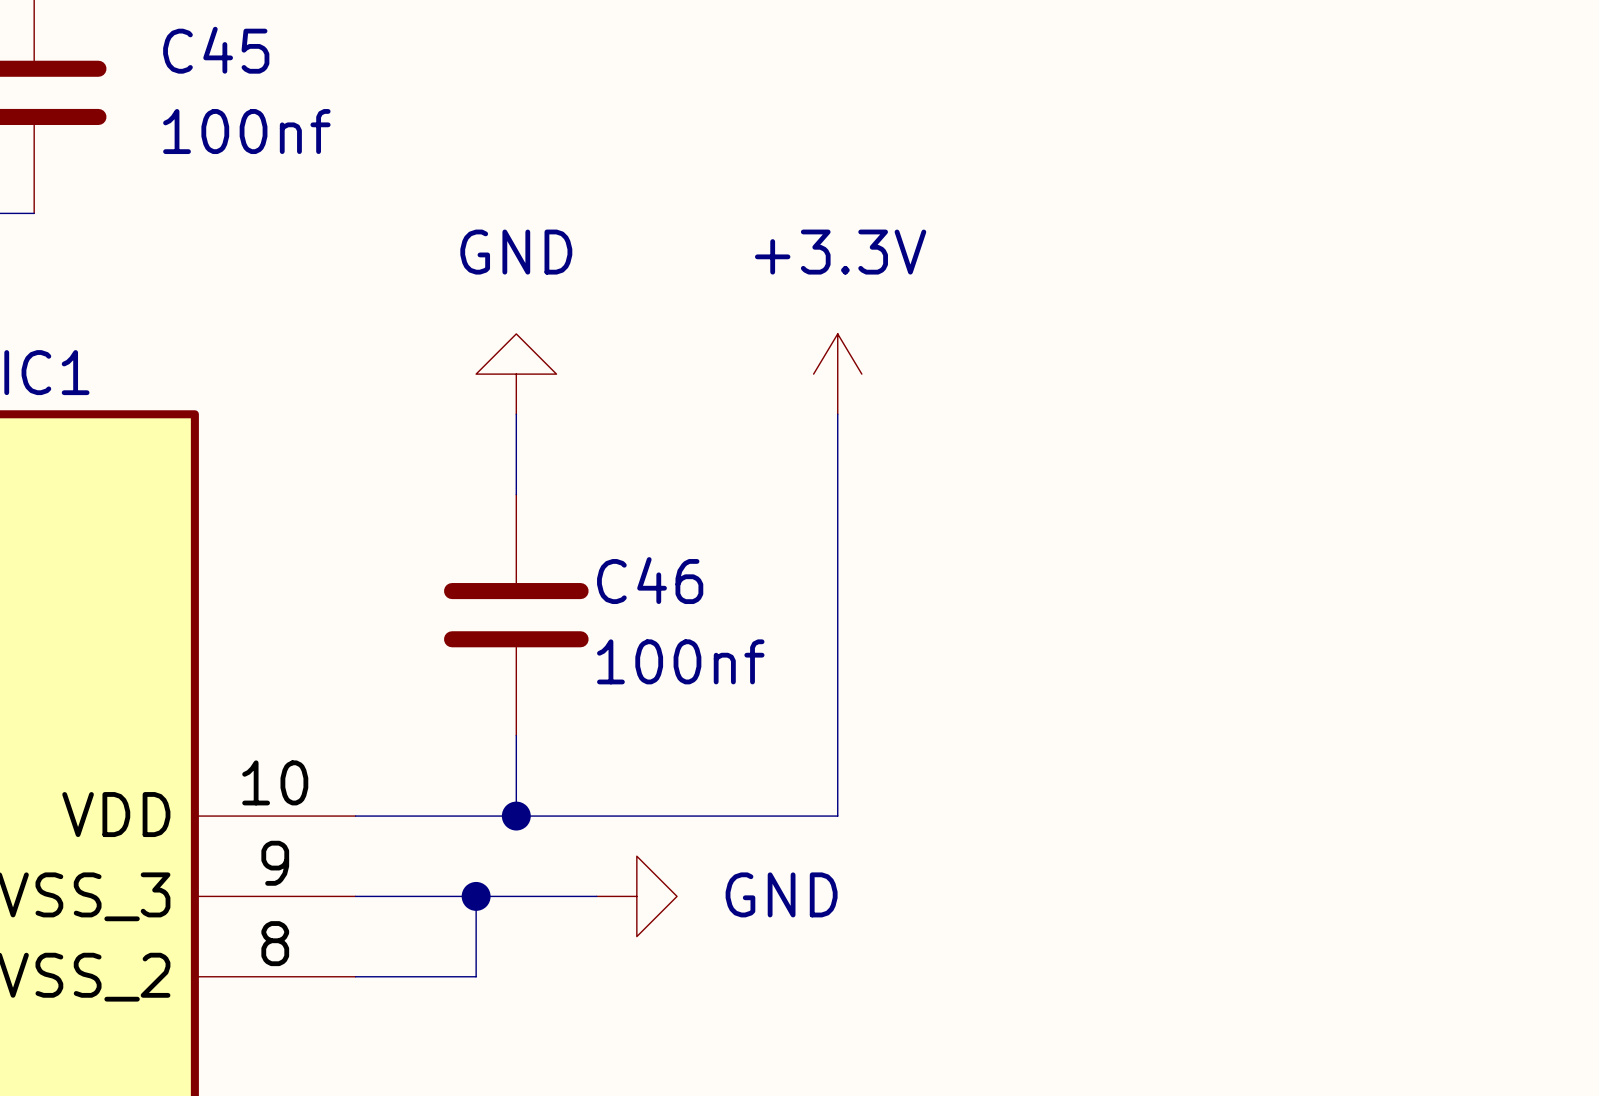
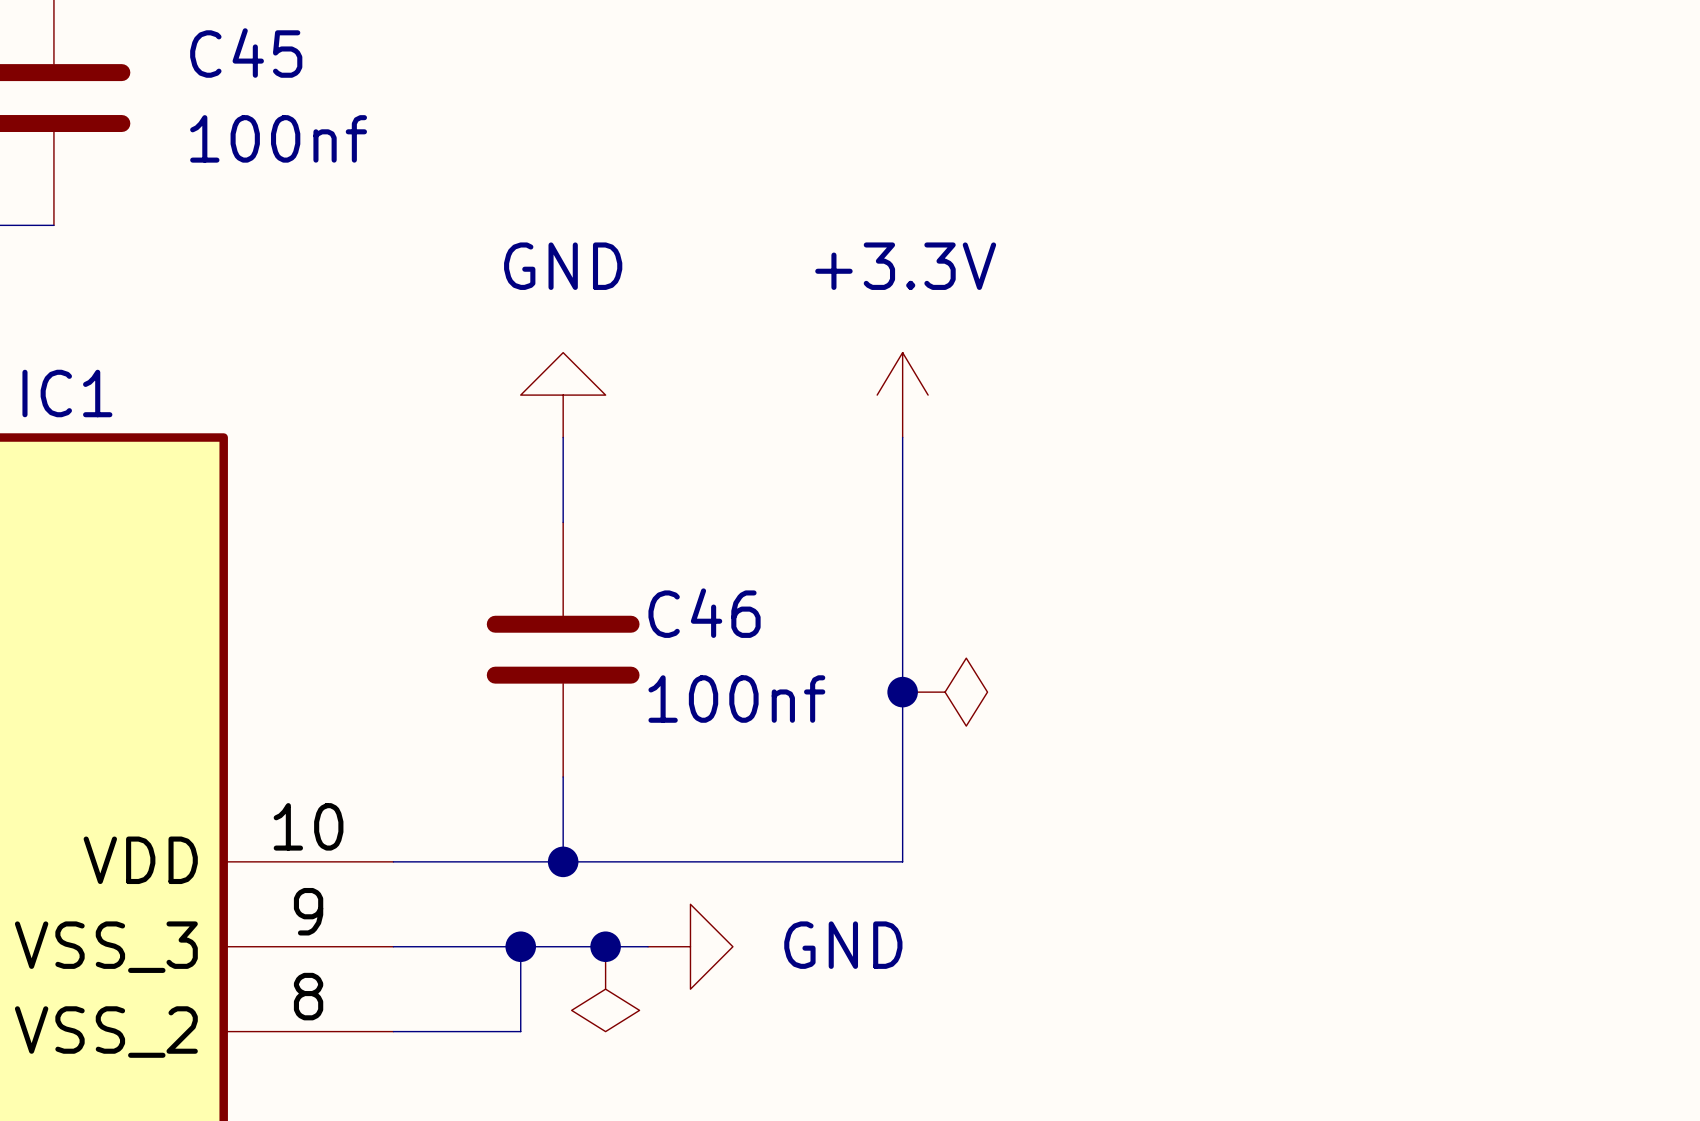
junction: none -> (902, 692)
power symbol: none -> (945, 692)
junction: none -> (605, 946)
power symbol: none -> (605, 989)

